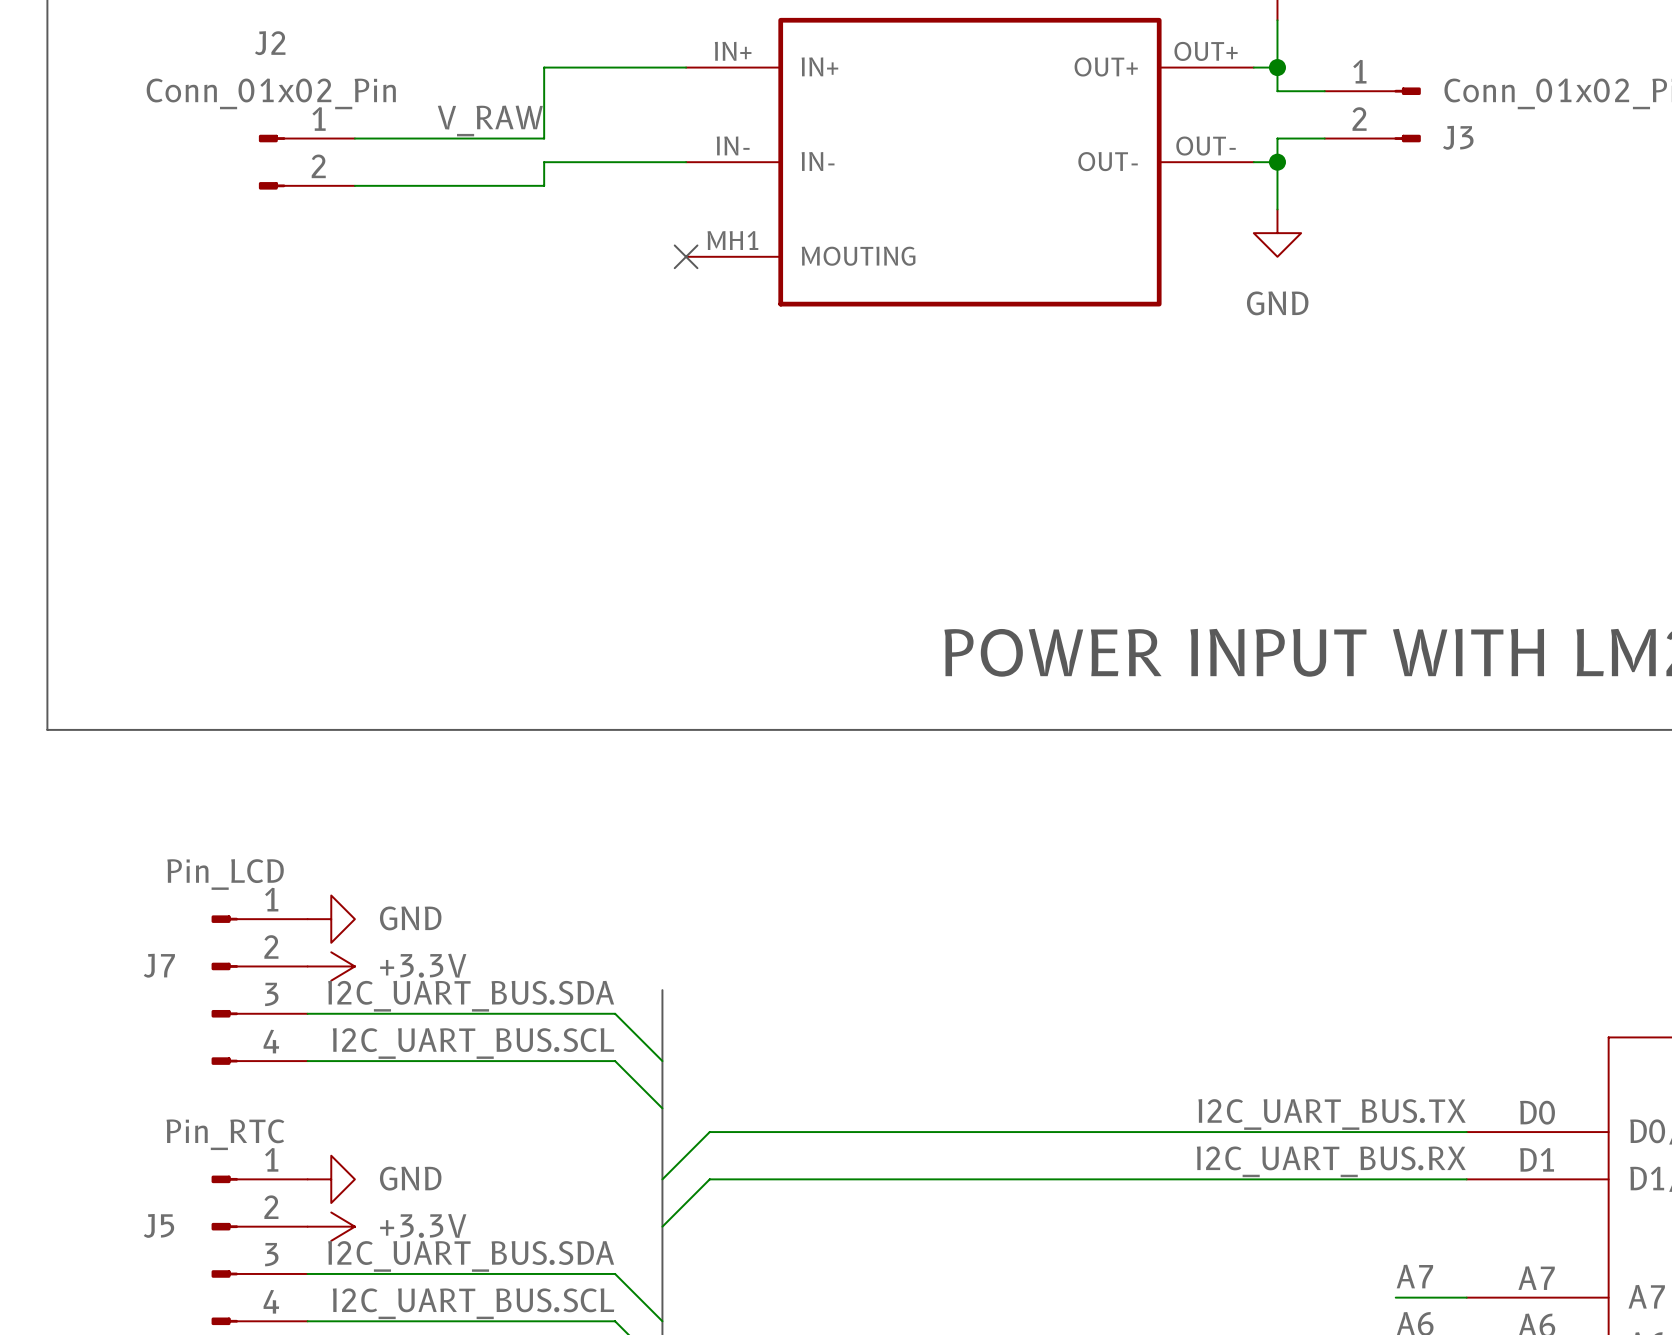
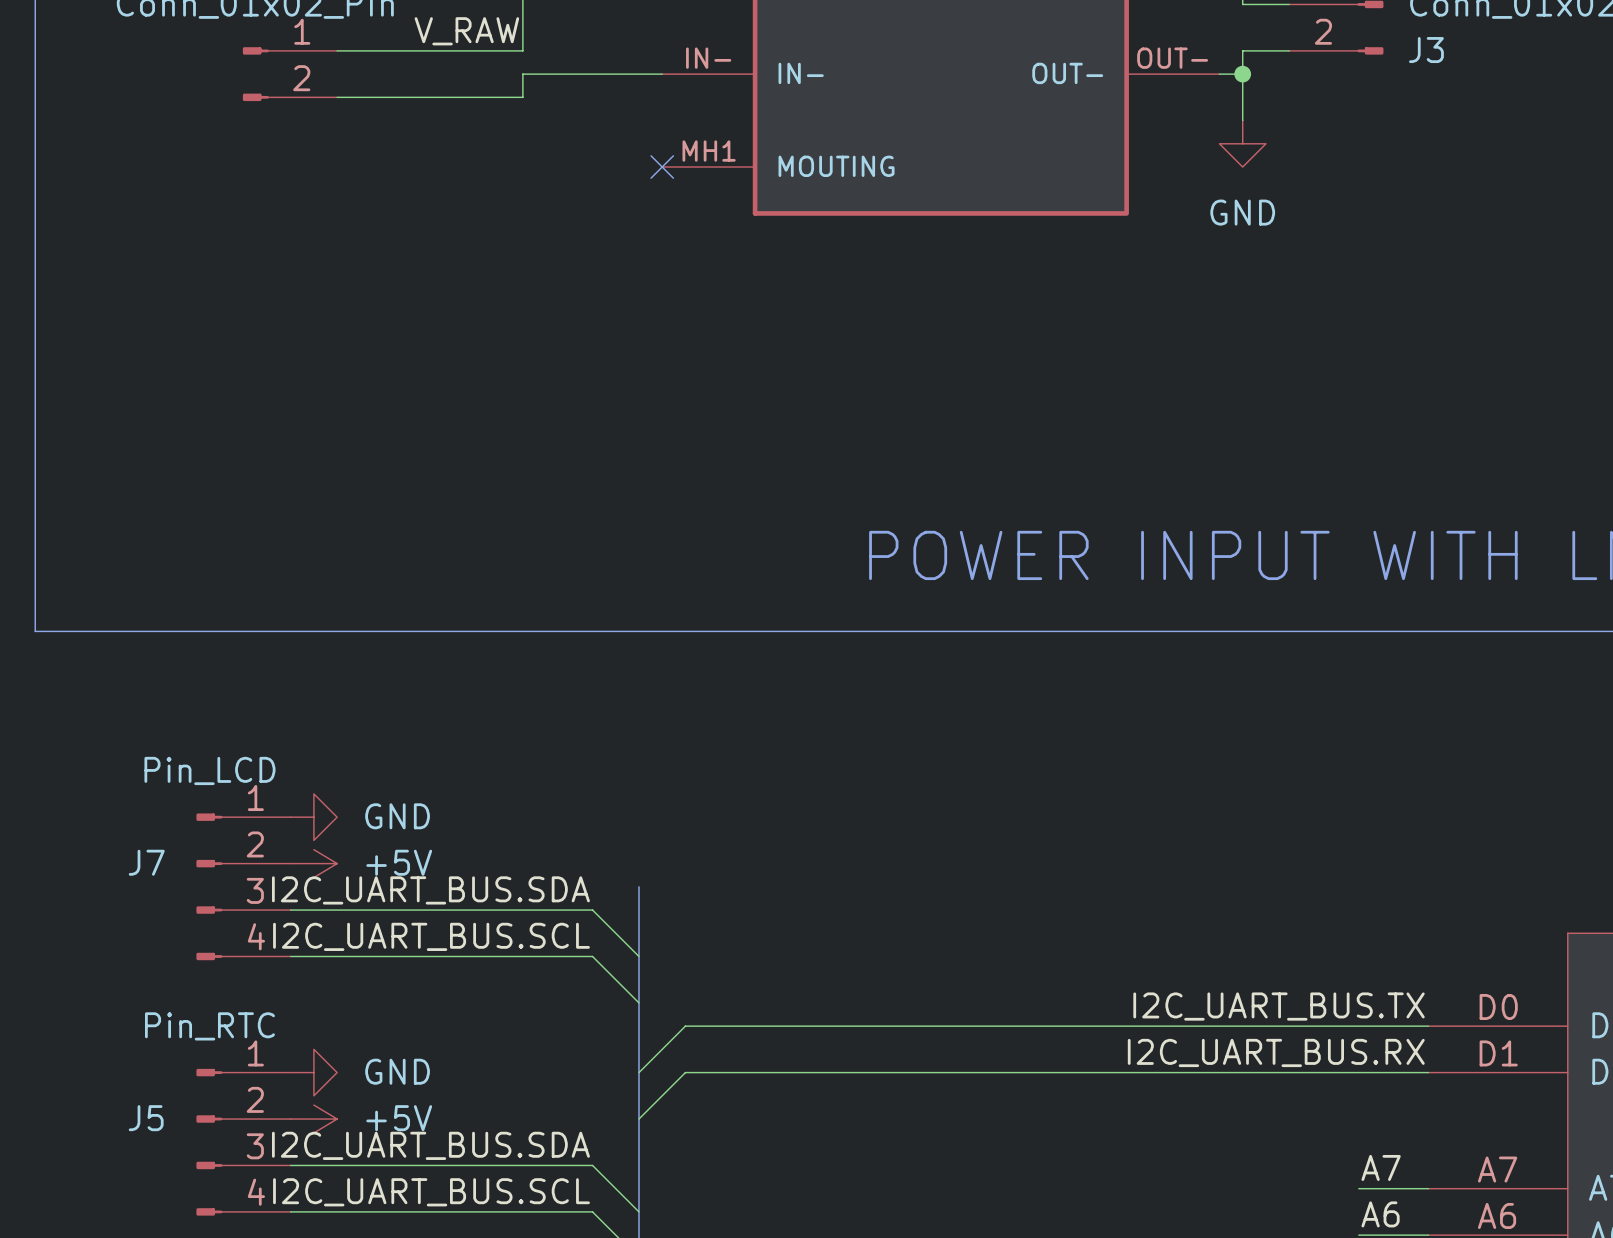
power symbol: +3.3V (331, 966) -> +5V (313, 863)
power symbol: +3.3V (331, 1226) -> +5V (313, 1119)

